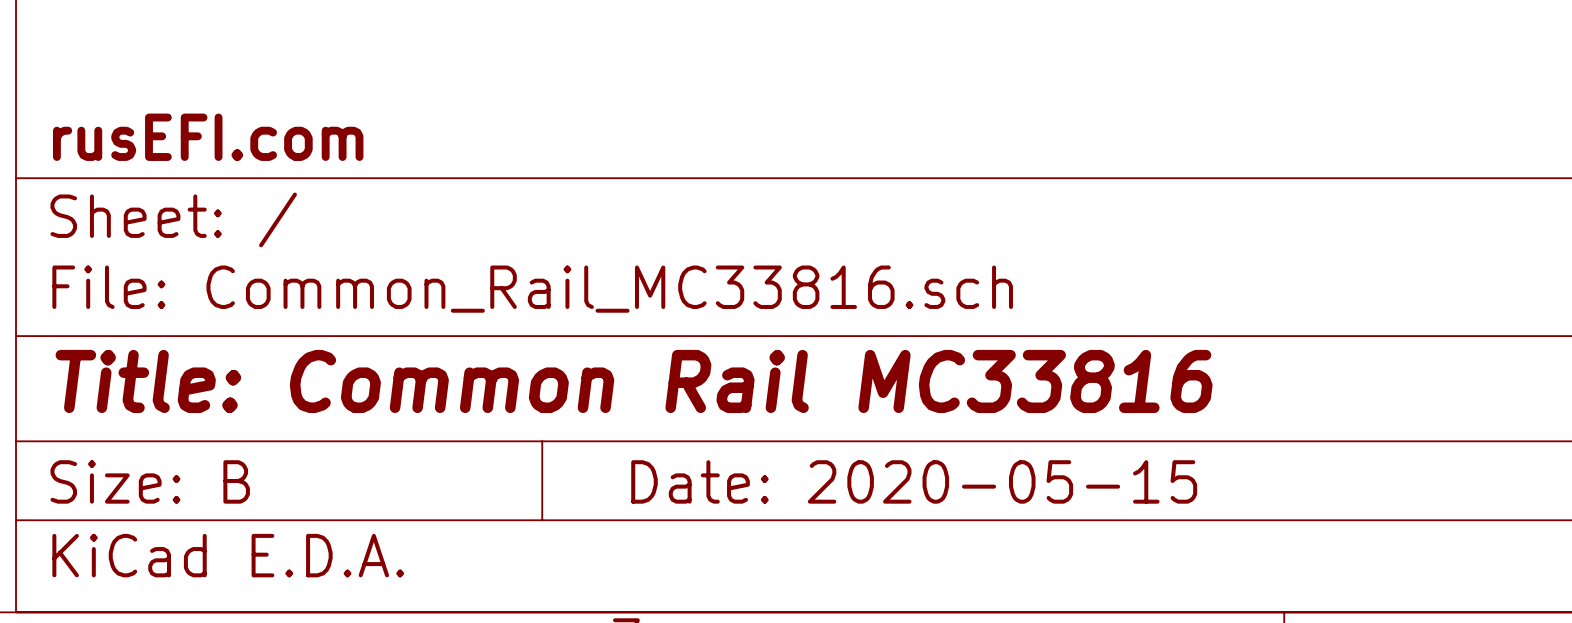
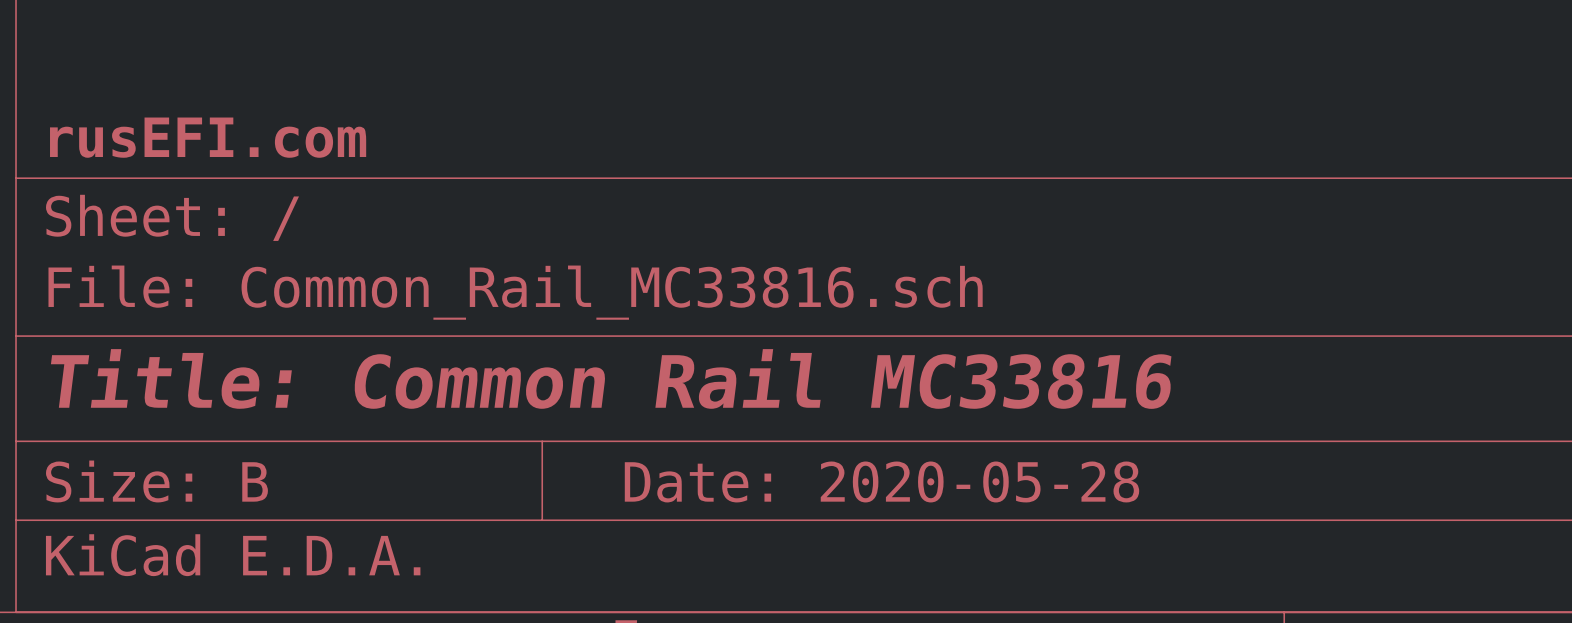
title block: Date: 2020-05-15 (914, 481) -> Date: 2020-05-28 (881, 481)

